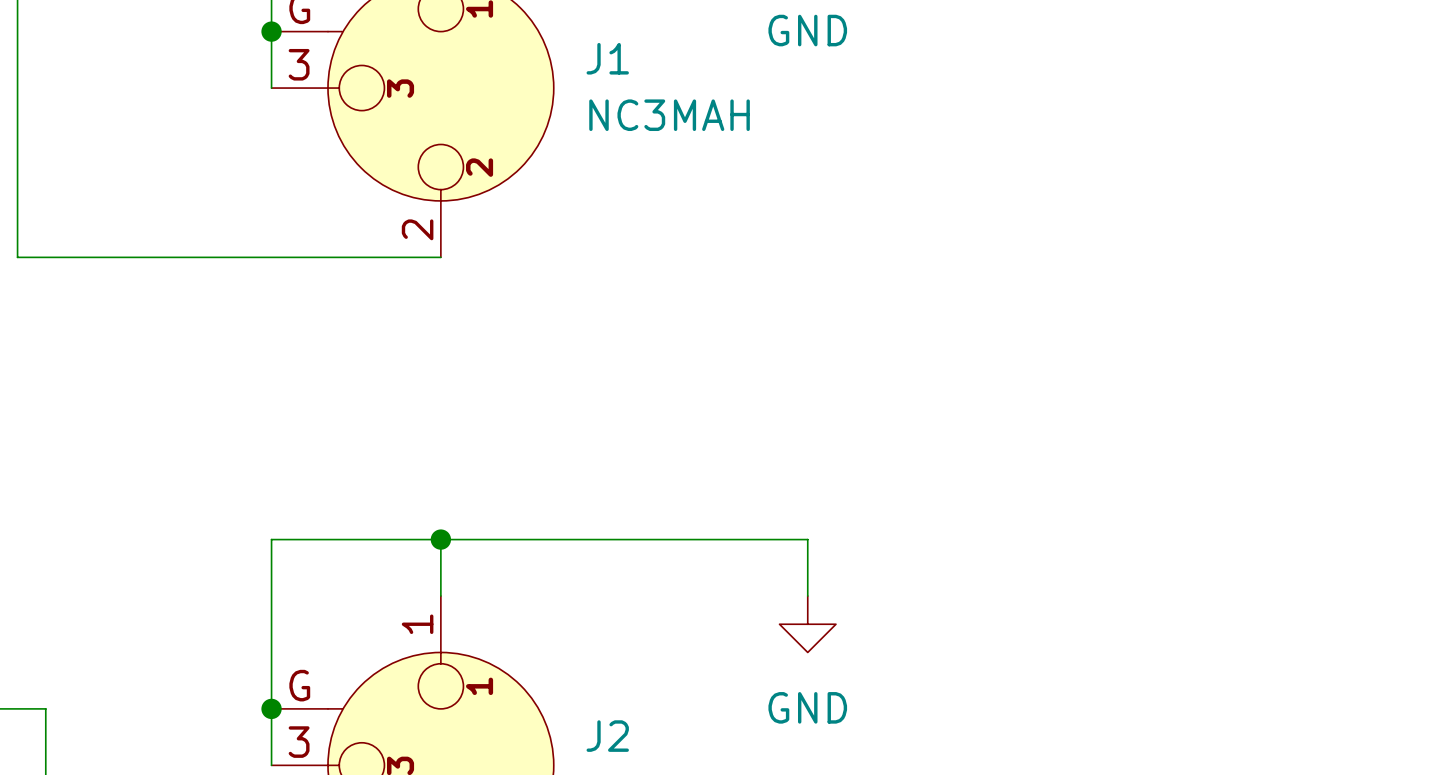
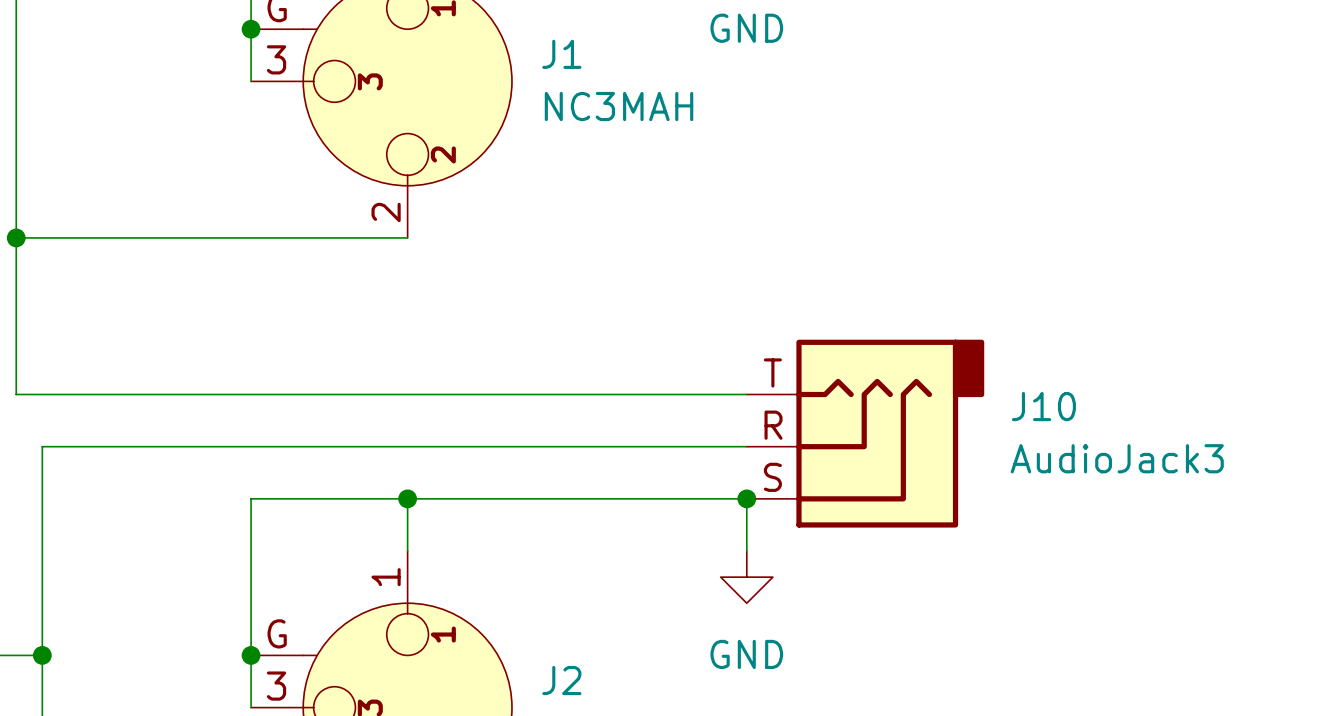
wire: none -> (16, 237) (16, 394) (746, 394)
junction: none -> (16, 237)
J10: none -> AudioJack3 (865, 433)
wire: none -> (746, 446) (42, 446) (42, 655)
junction: none -> (746, 498)
junction: none -> (42, 655)

